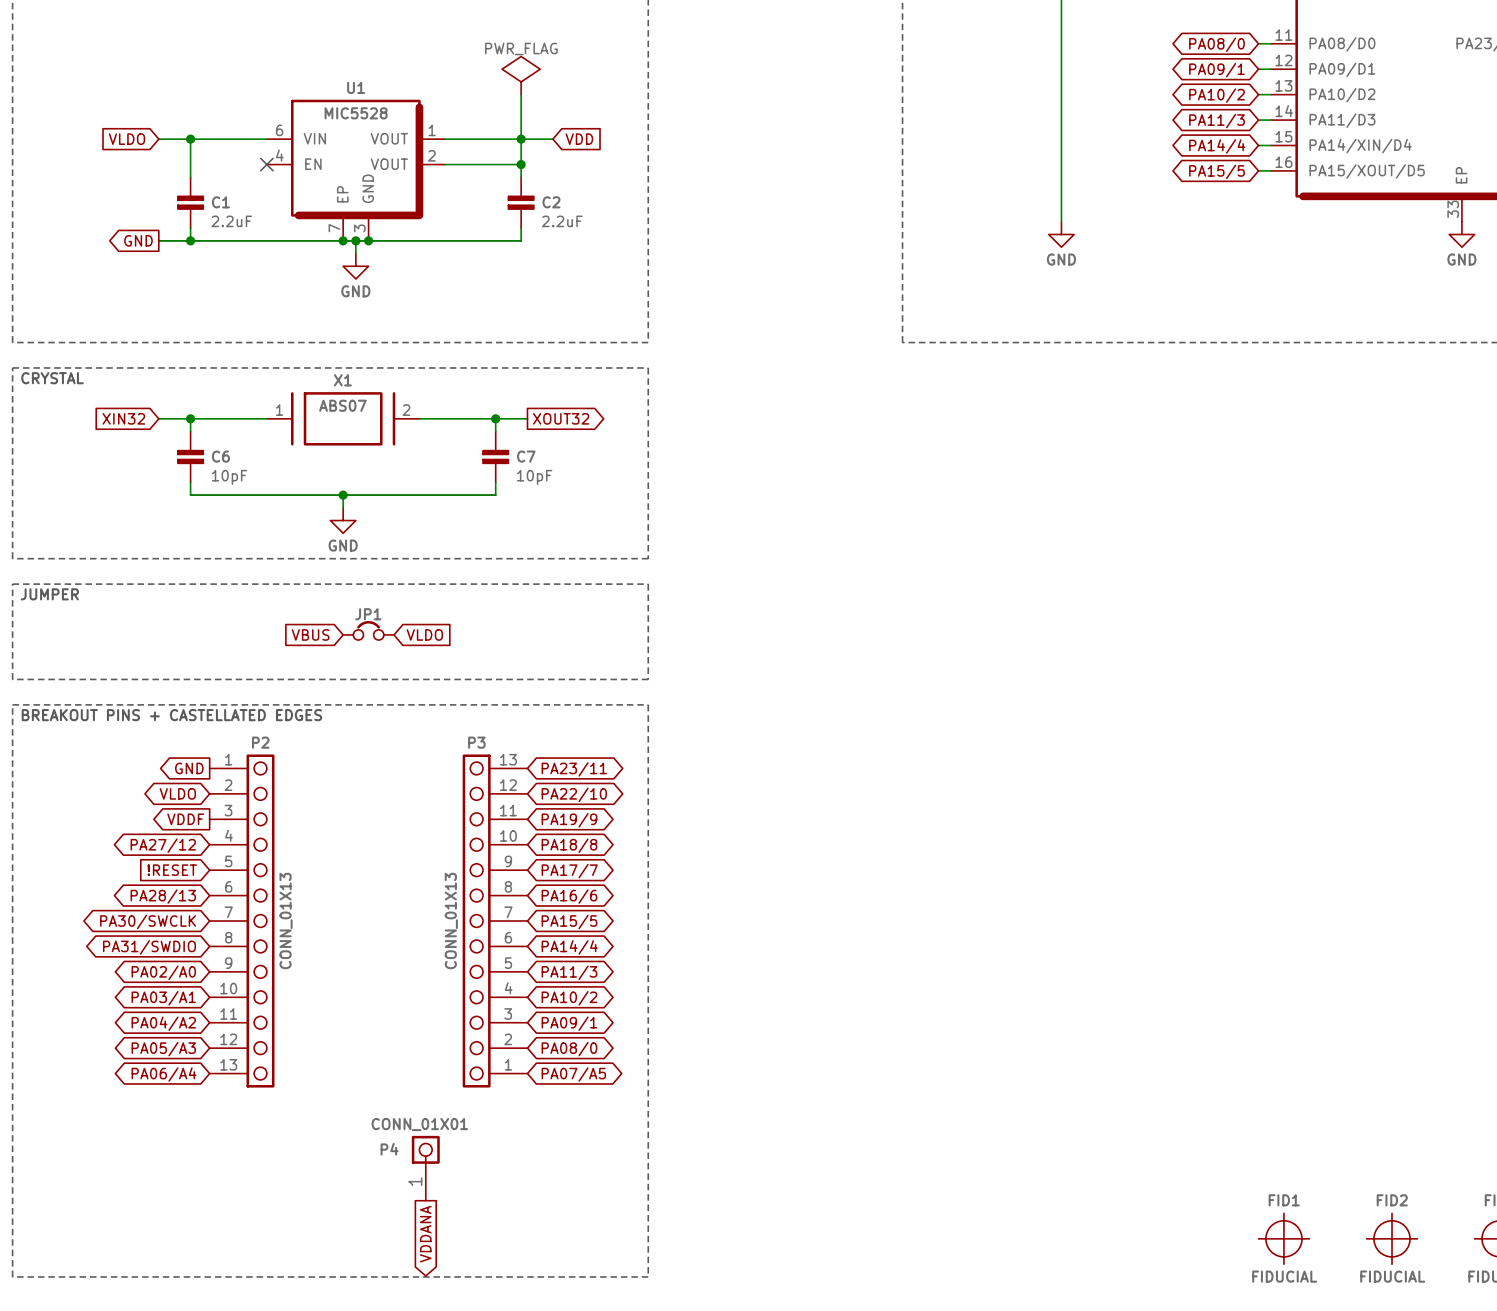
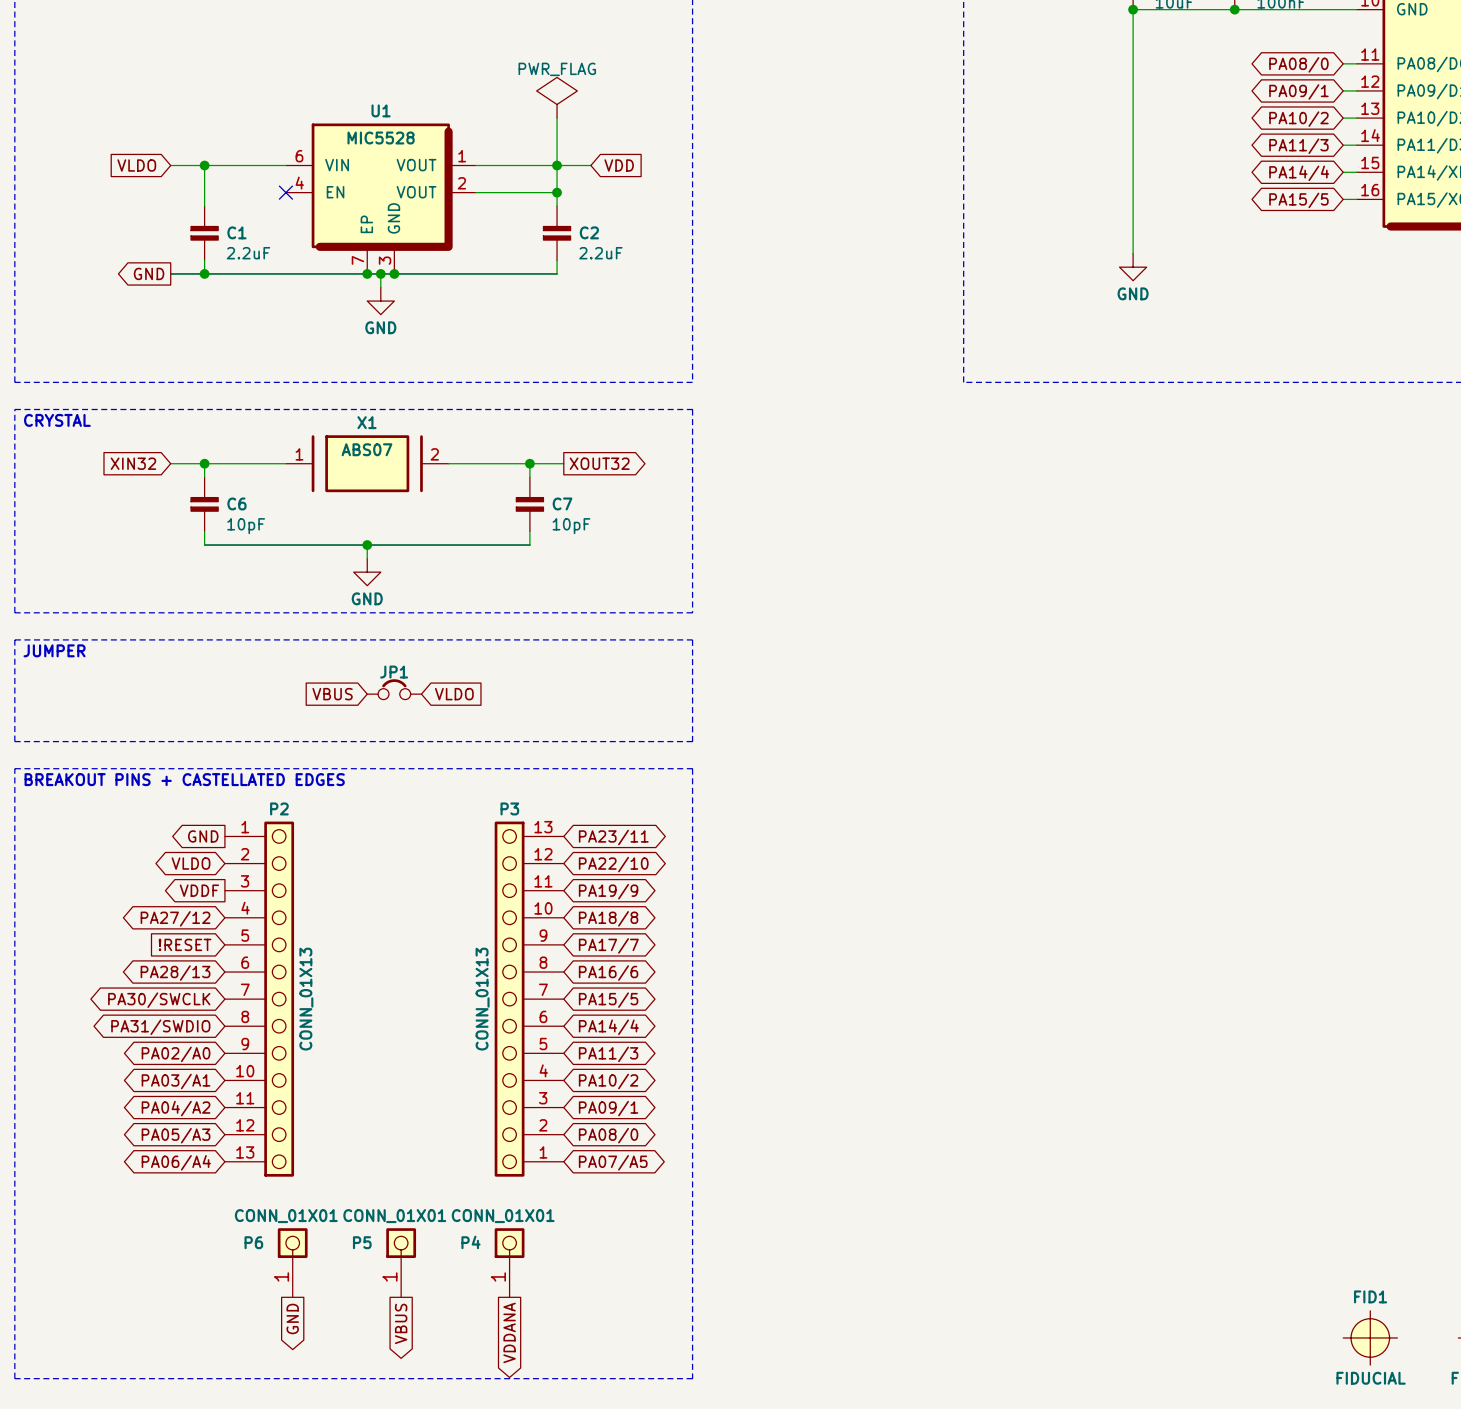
P6: none -> CONN_01X01 (292, 1262)
P5: none -> CONN_01X01 (401, 1262)
P4 position: (425, 1168) -> (509, 1262)
global label: none -> GND (292, 1318)
global label: none -> VBUS (401, 1323)
global label position: VDDANA (425, 1234) -> VDDANA (509, 1332)

